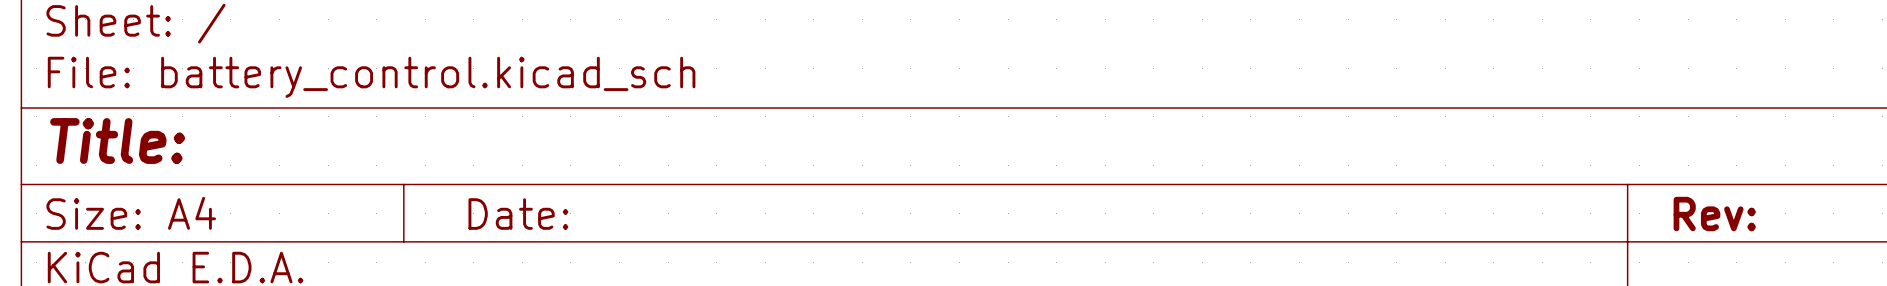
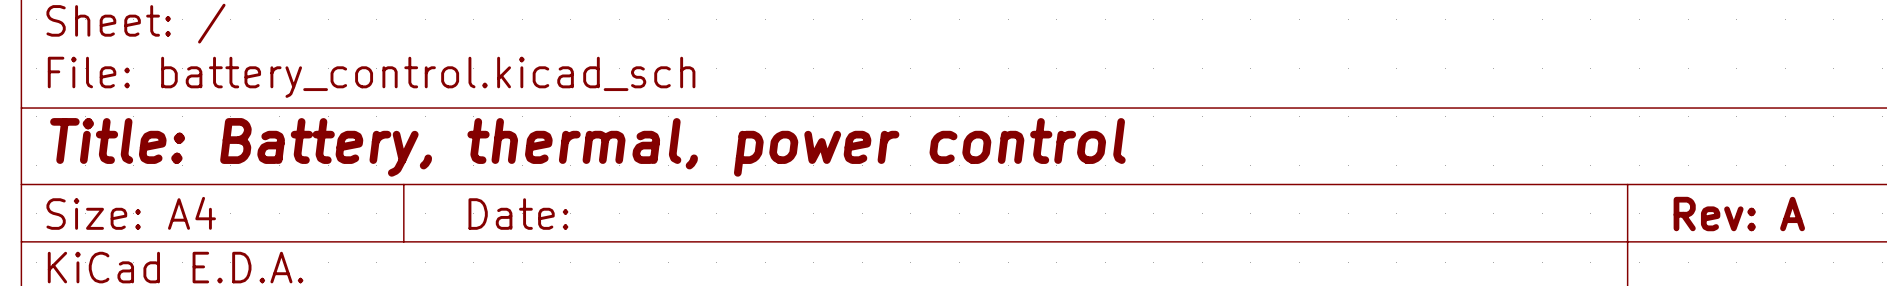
title block: Title: (117, 141) -> Title: Battery, thermal, power control (587, 147)
title block: Rev: (1714, 214) -> Rev: A (1739, 214)

